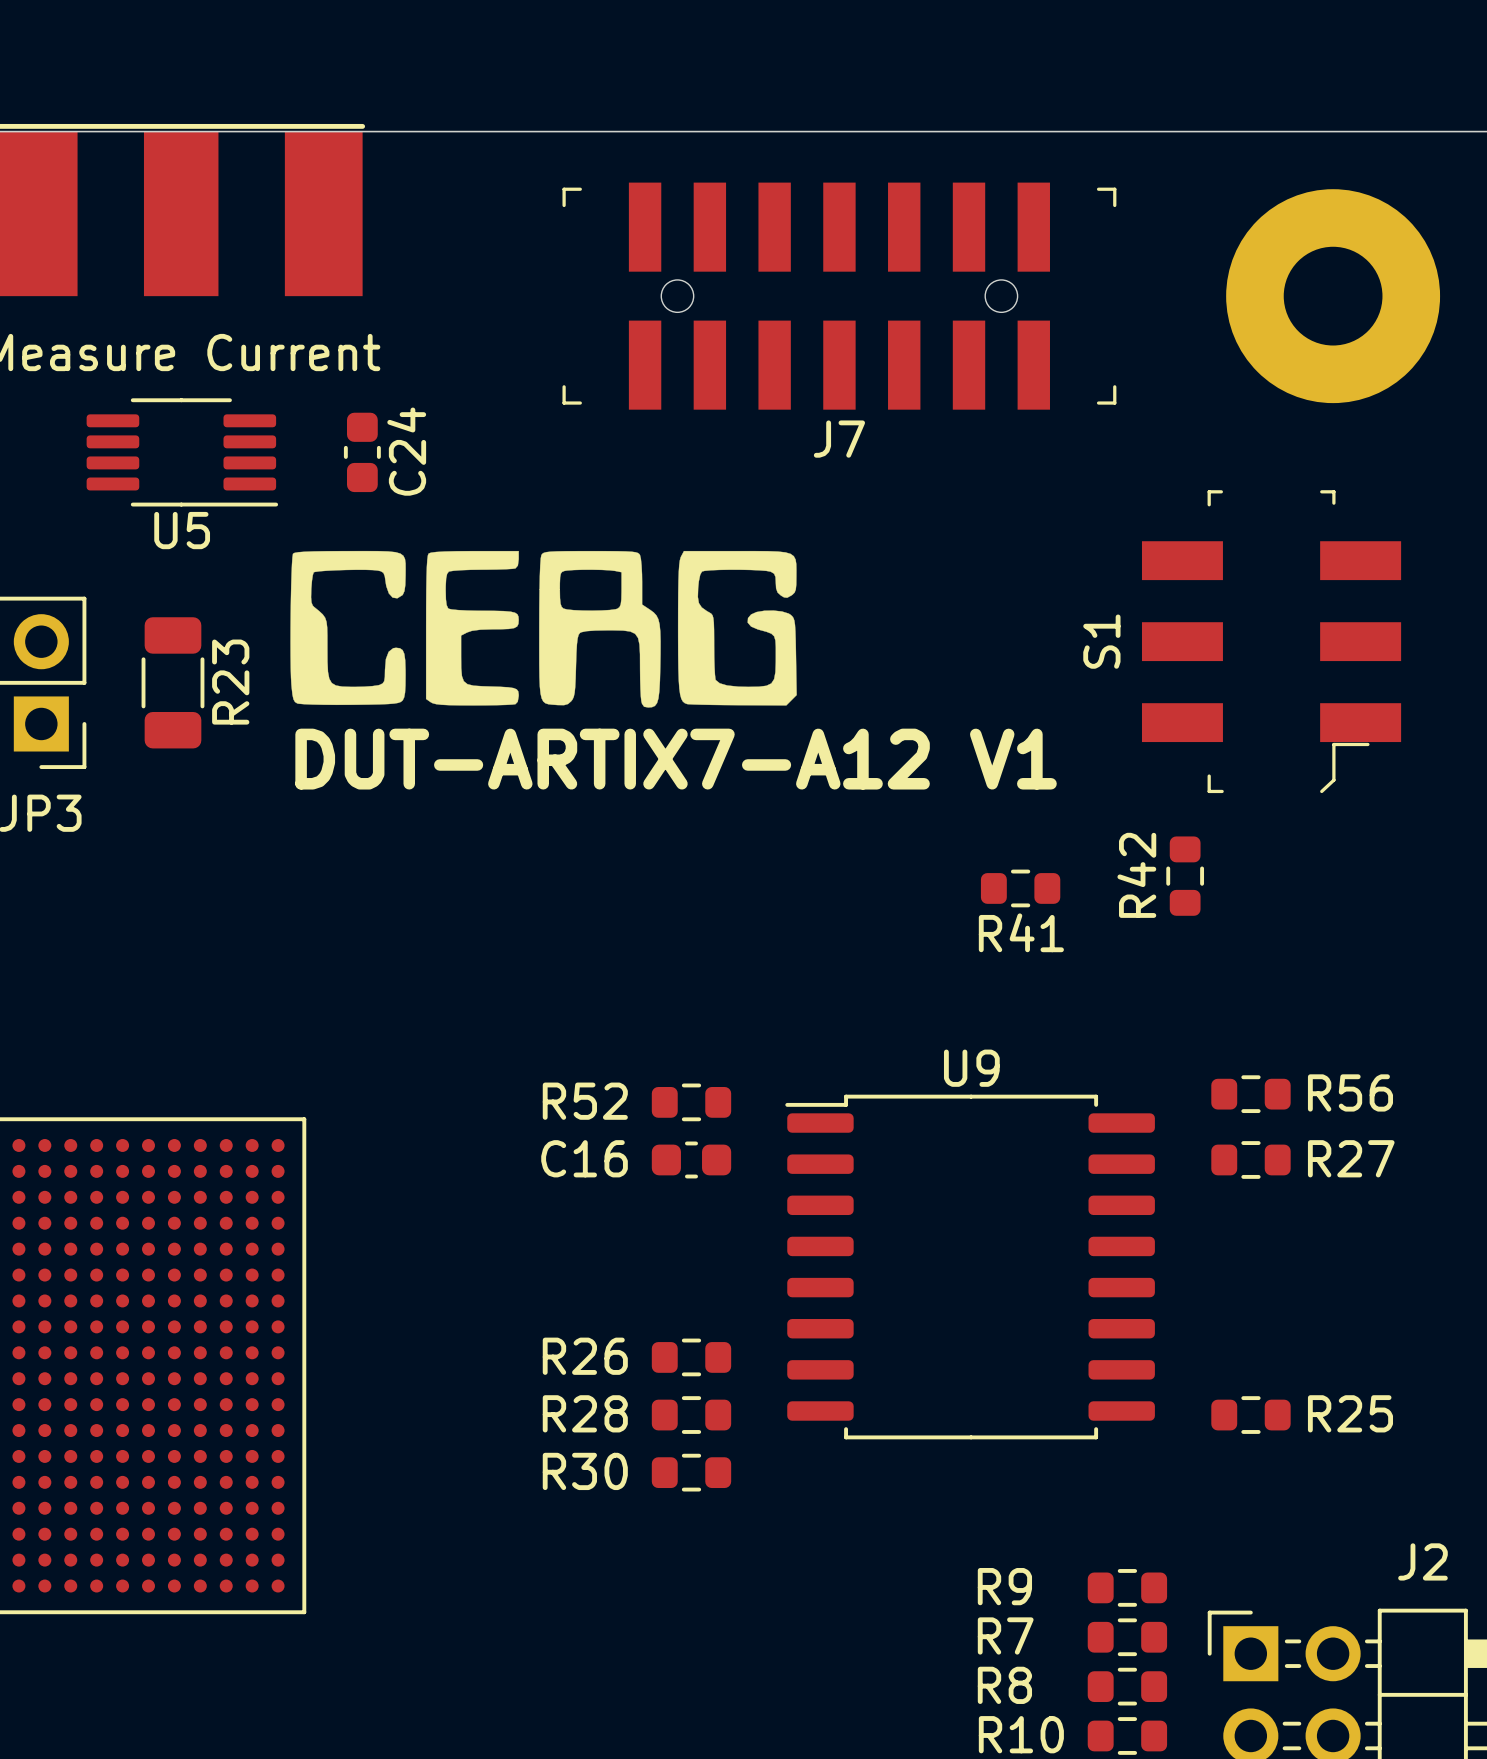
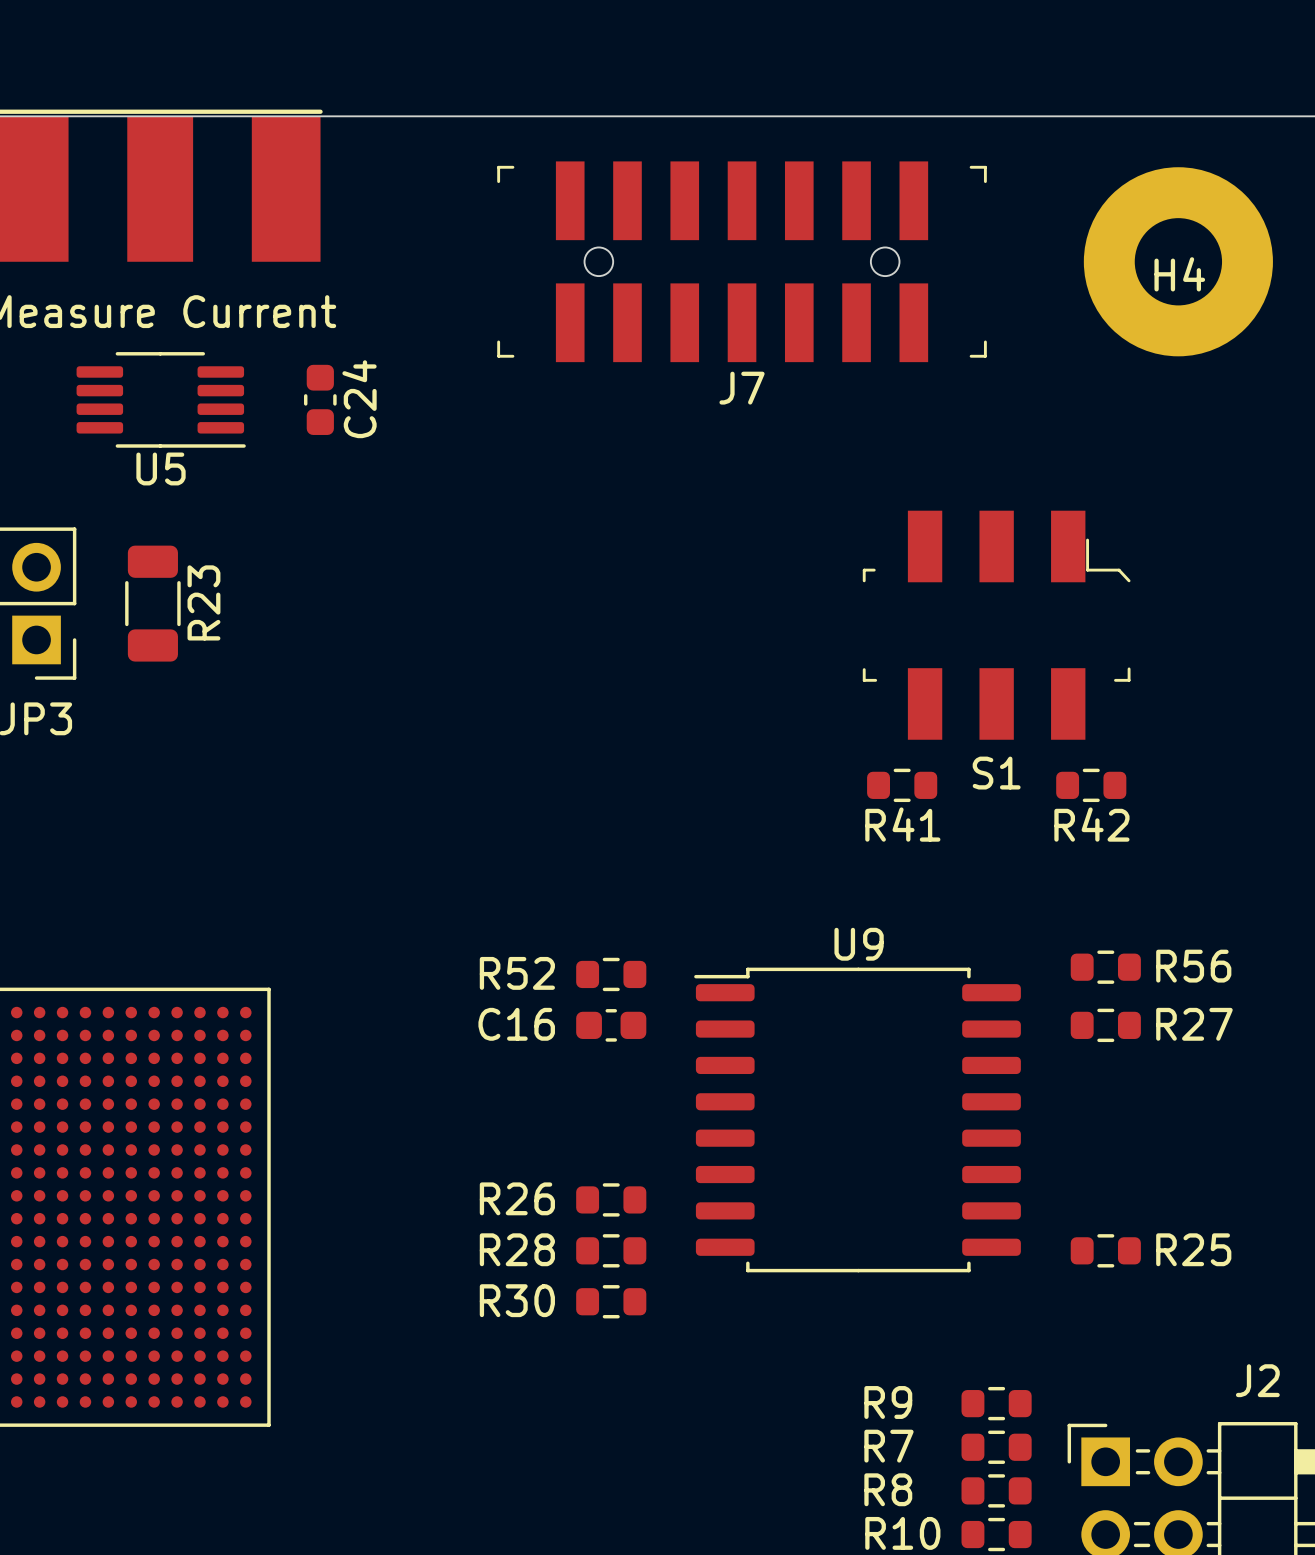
H4 name: none -> H4 (1179, 274)
drawing: [290, 550, 797, 708] -> none
S1 rotation: 0° (1271, 641) -> 90° counterclockwise (996, 625)
text: DUT-ARTIX7-A12 V1 (676, 759) -> none
R42 name position: R42 (1136, 875) -> R42 (1091, 824)
R42 rotation: 0° (1185, 876) -> 90° clockwise (1091, 785)
R42 position: (1185, 876) -> (1091, 785)

